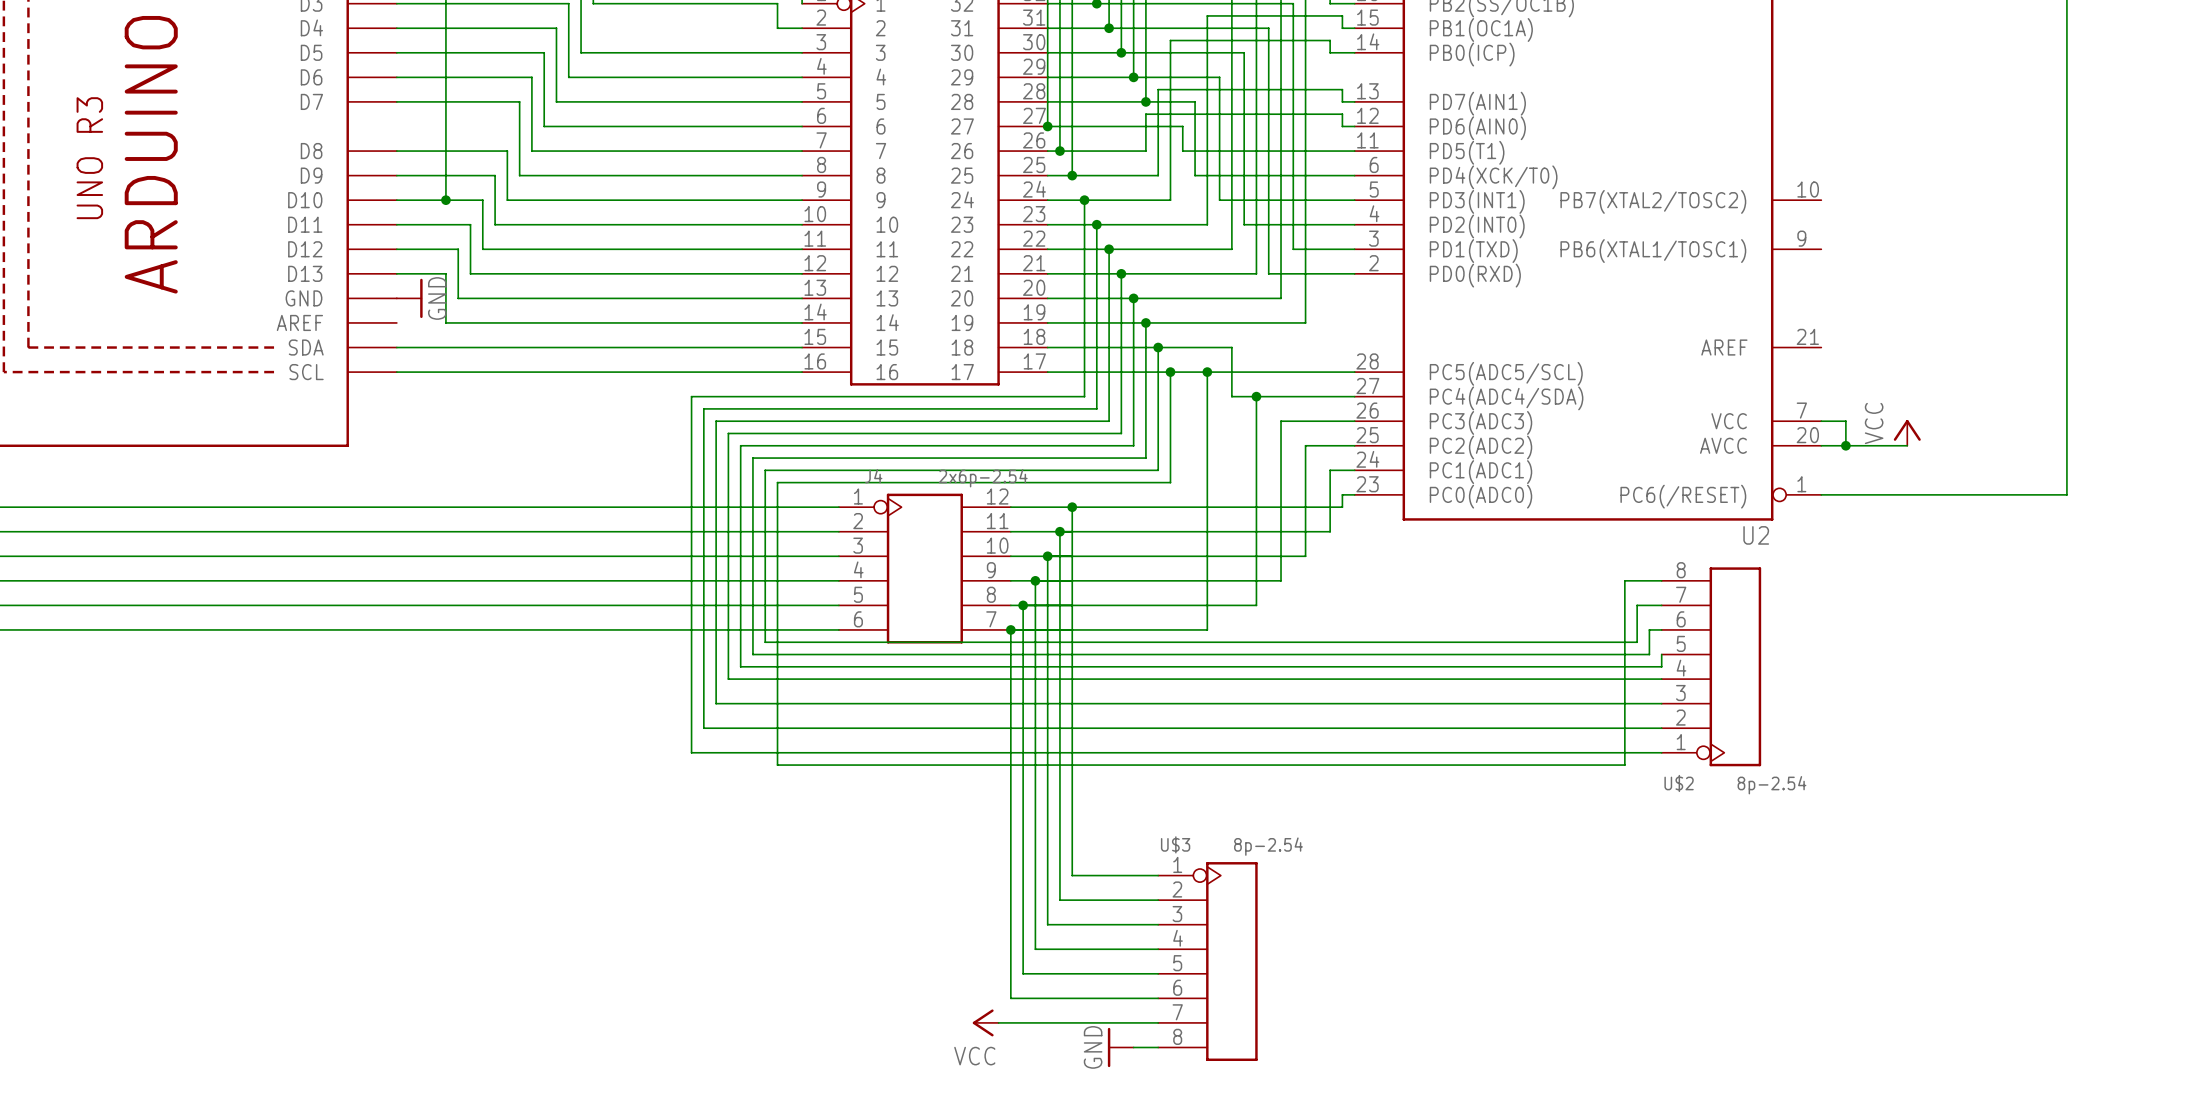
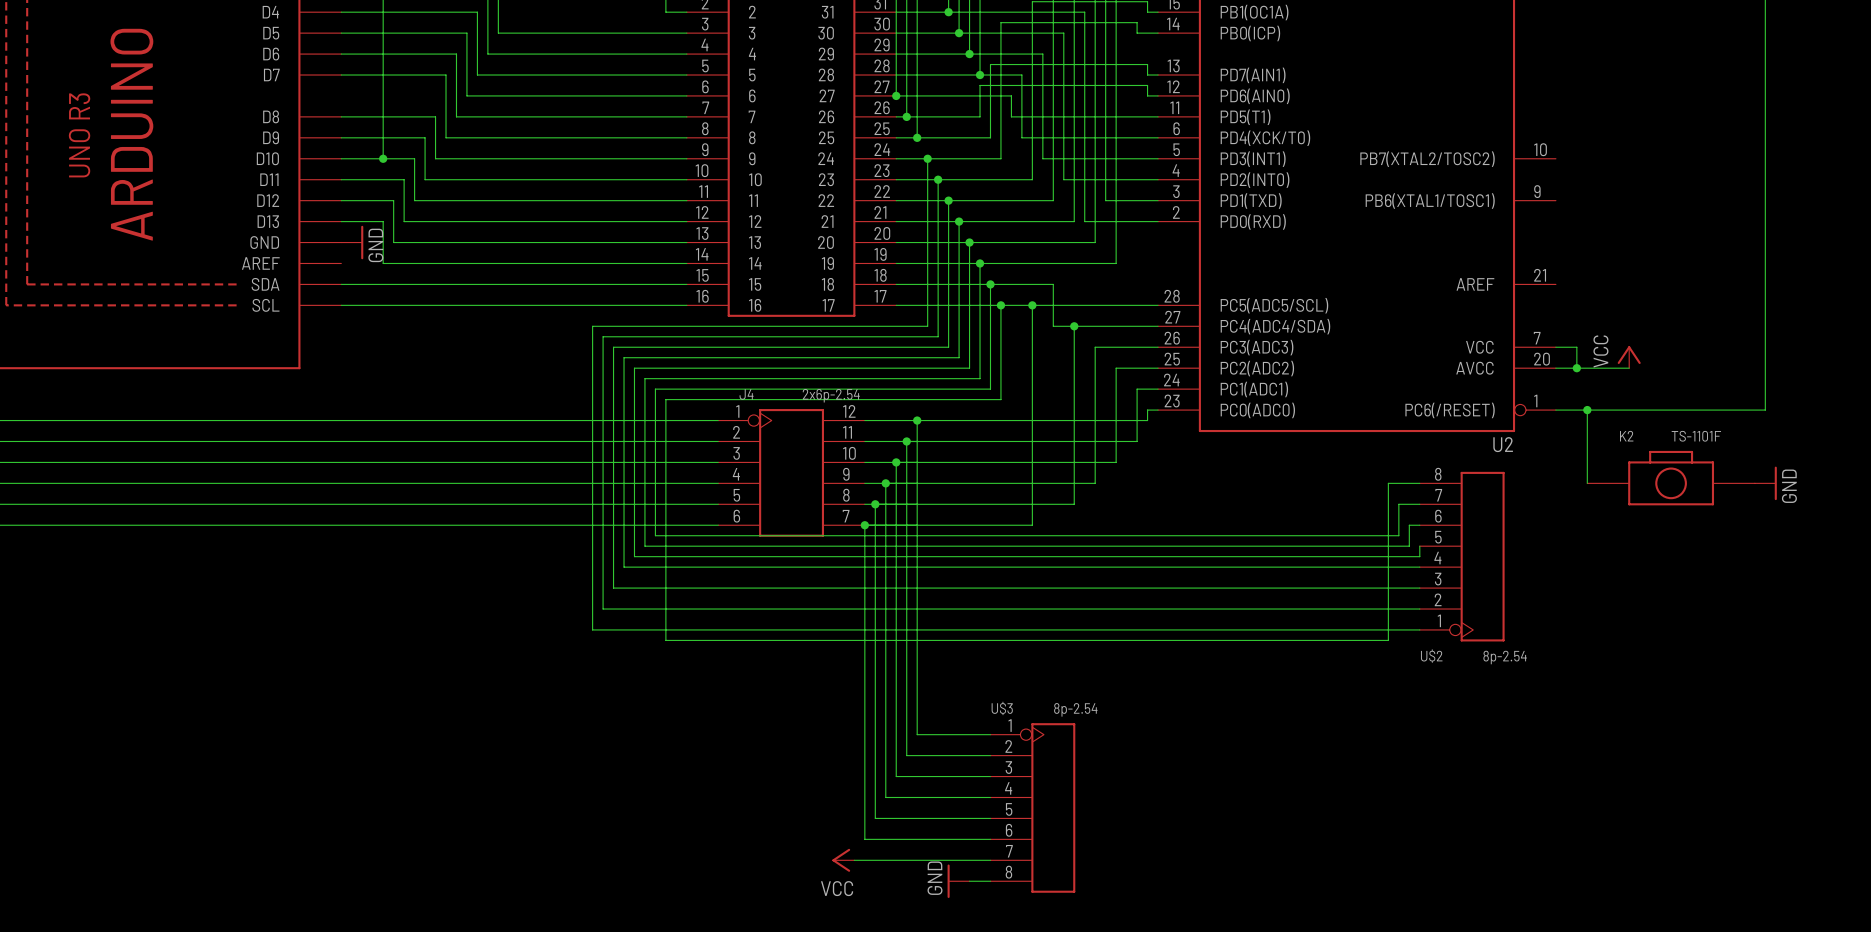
wire: none -> (1587, 410) (1587, 483)
junction: none -> (1587, 410)
K2: none -> TS-1101F (1671, 478)
power symbol: none -> GND (1765, 483)

